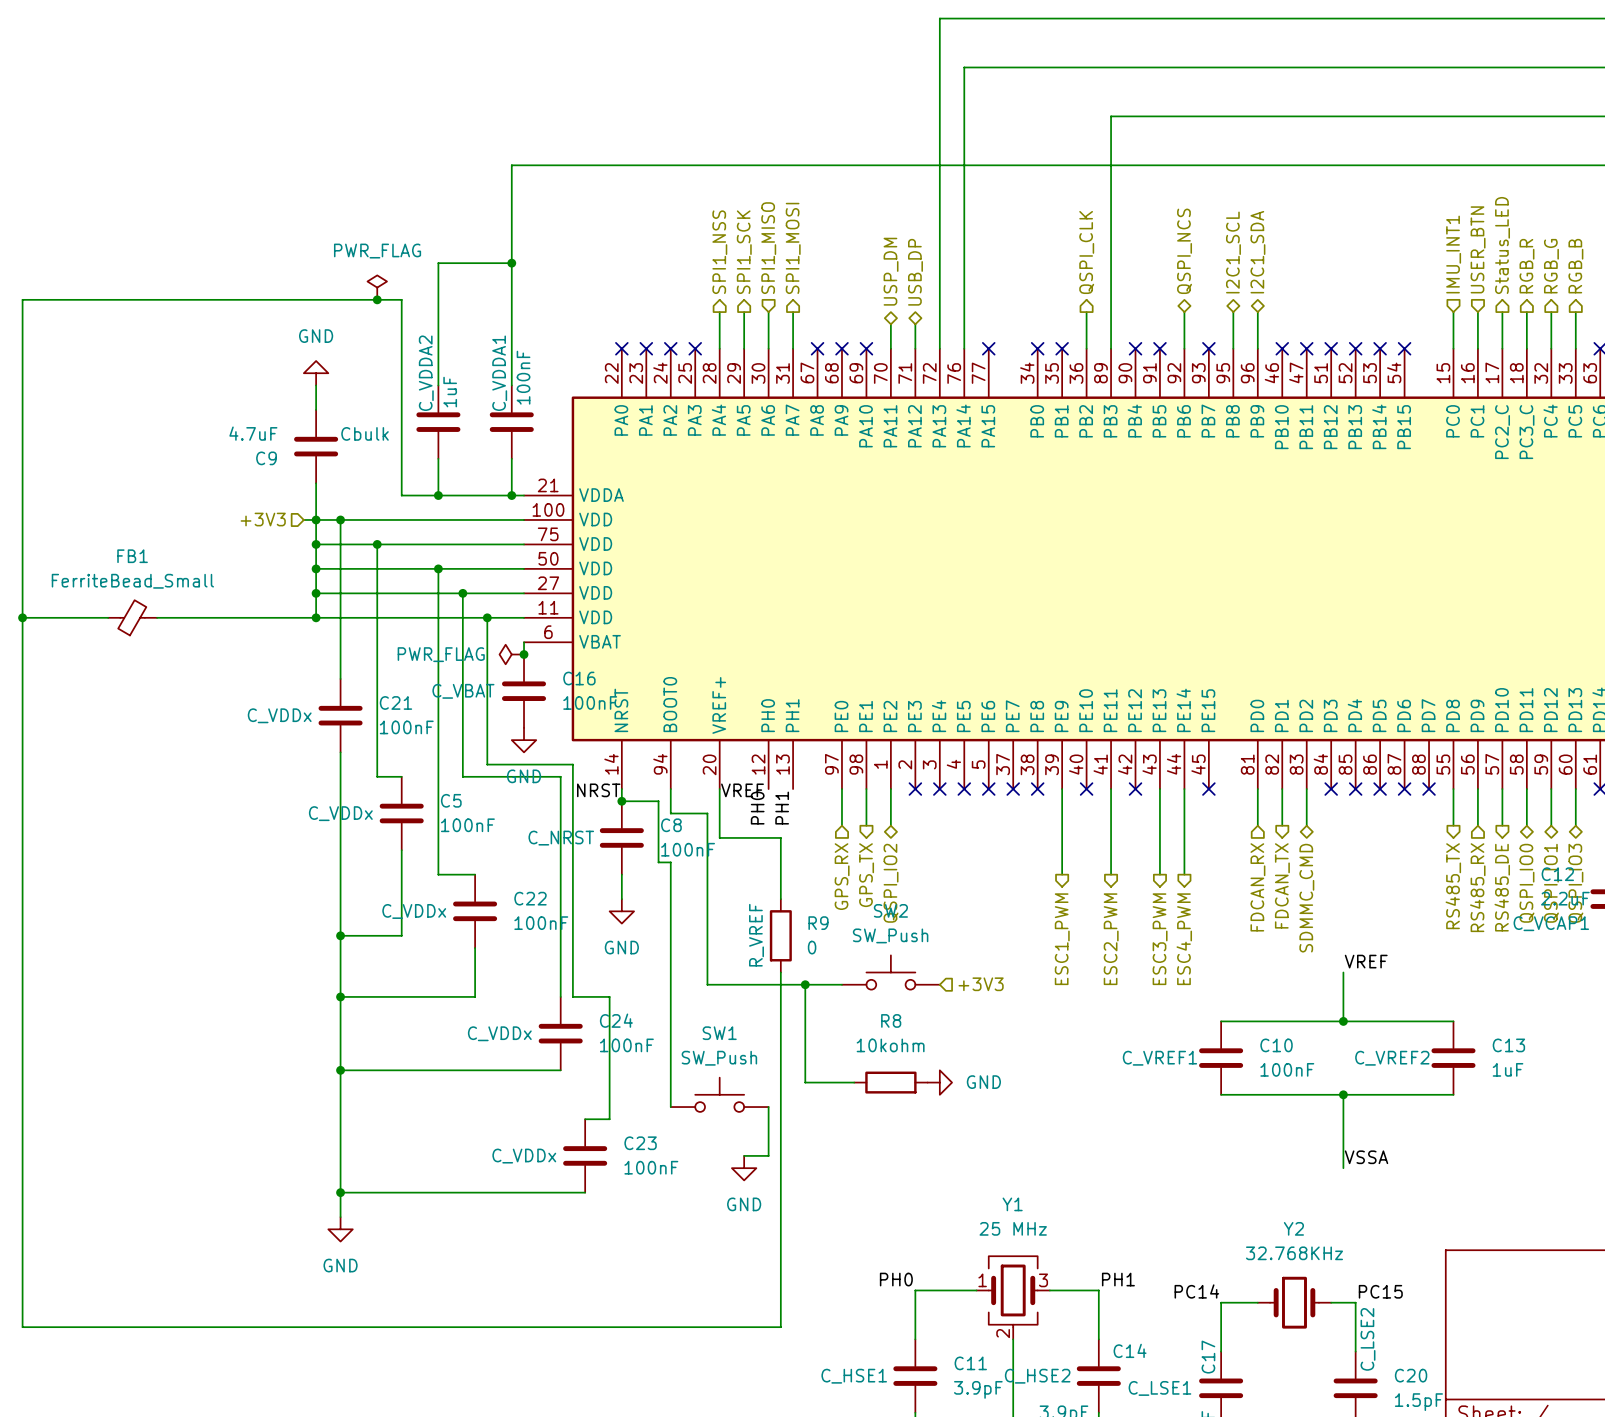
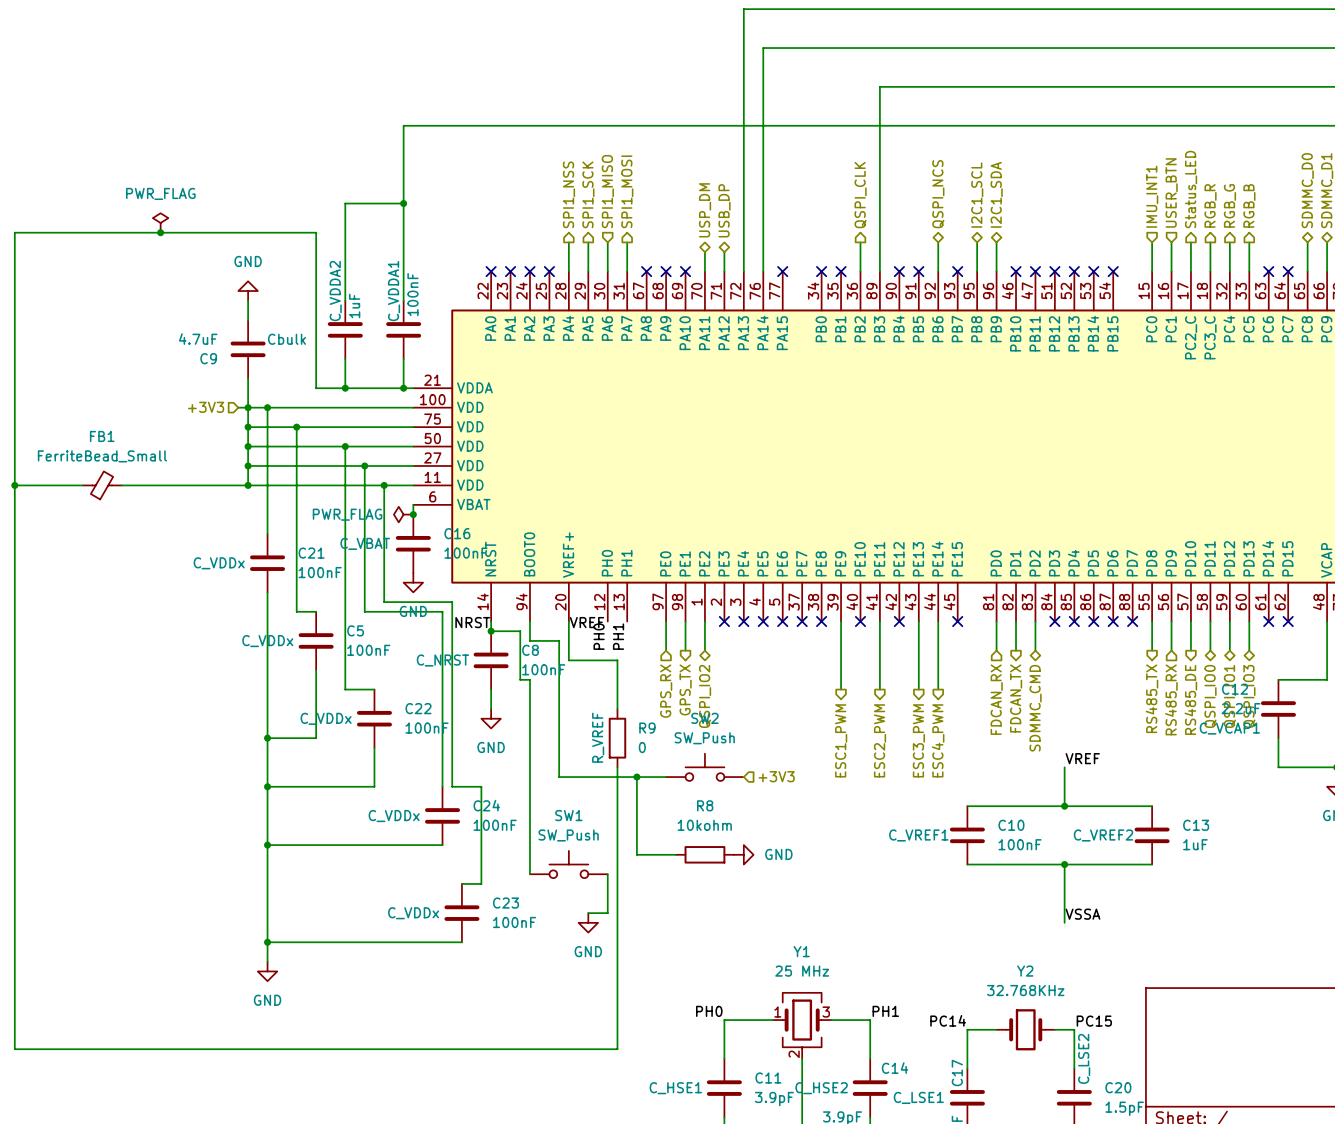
power symbol position: PWR_FLAG (377, 287) -> PWR_FLAG (160, 222)
junction: none -> (160, 232)
junction: (377, 299) -> none

